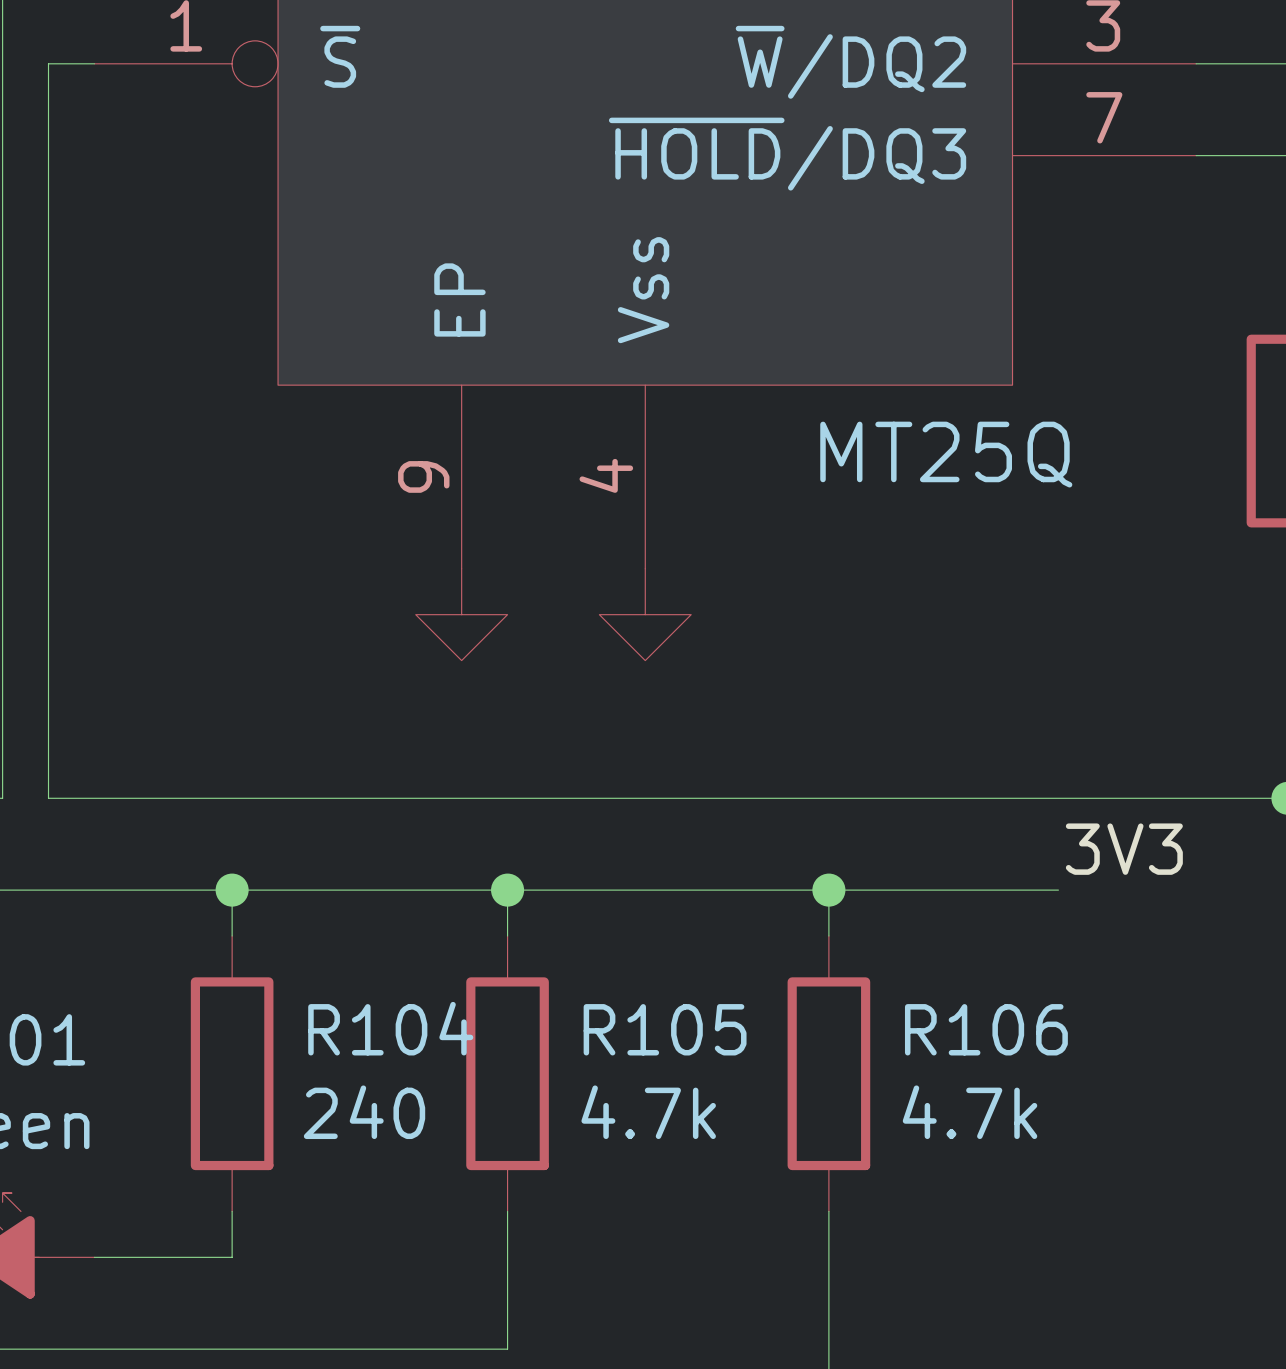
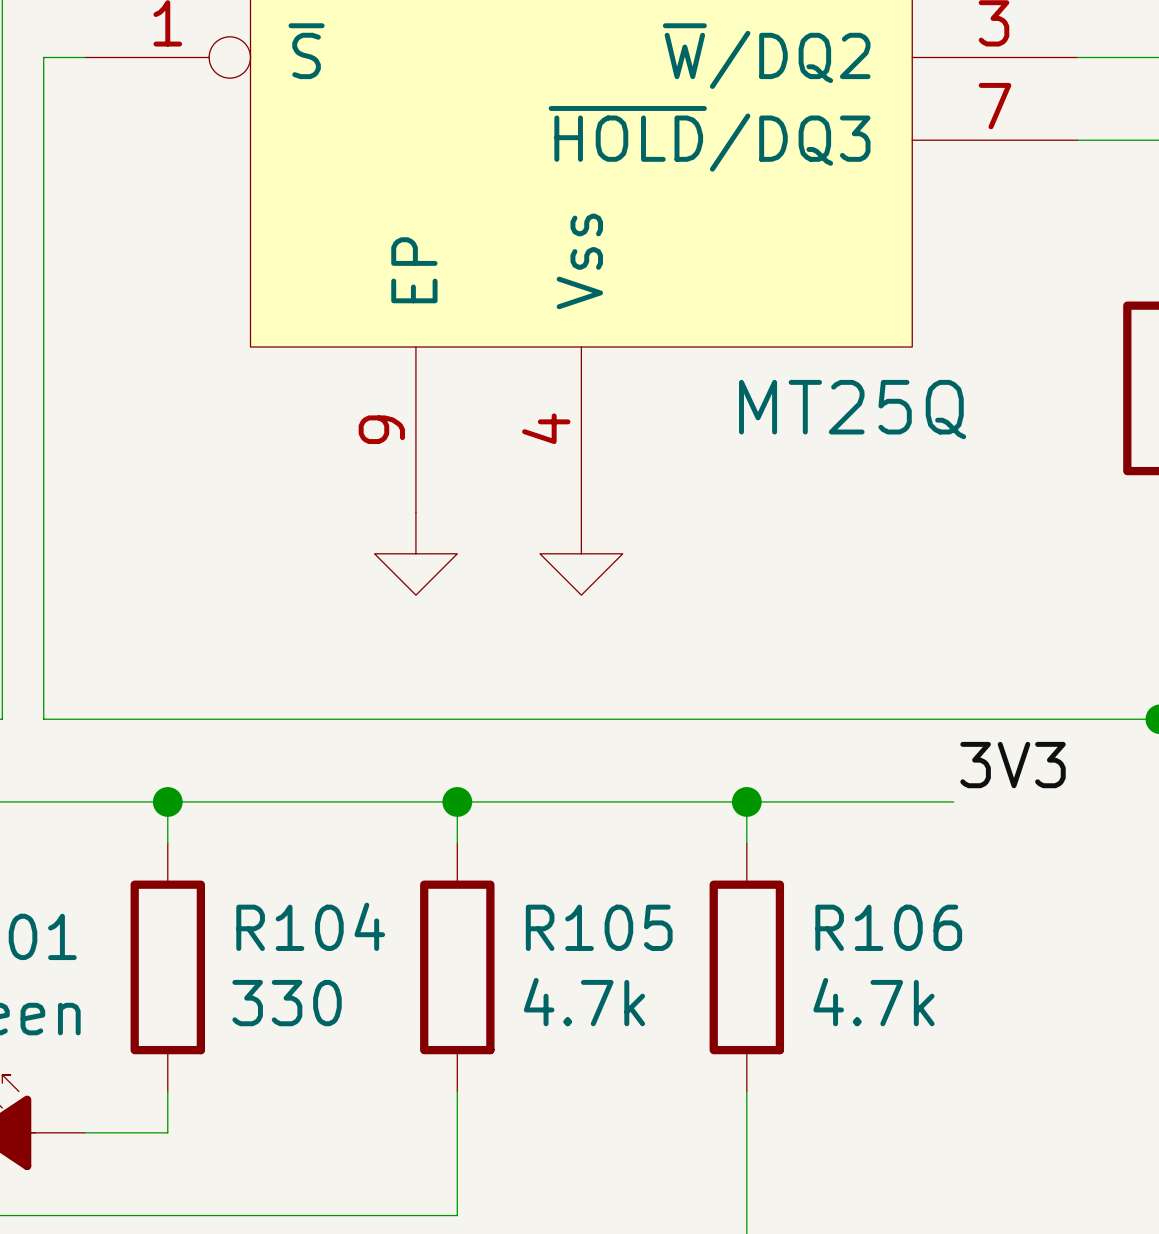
wire: (232, 890) (232, 936) -> (167, 801) (167, 843)
junction position: (232, 890) -> (167, 801)
R104 position: (232, 1073) -> (167, 967)
R104 value: 240 (364, 1112) -> 330 (287, 1003)
wire: (232, 1211) (232, 1257) (186, 1257) -> (167, 1091) (167, 1132)

